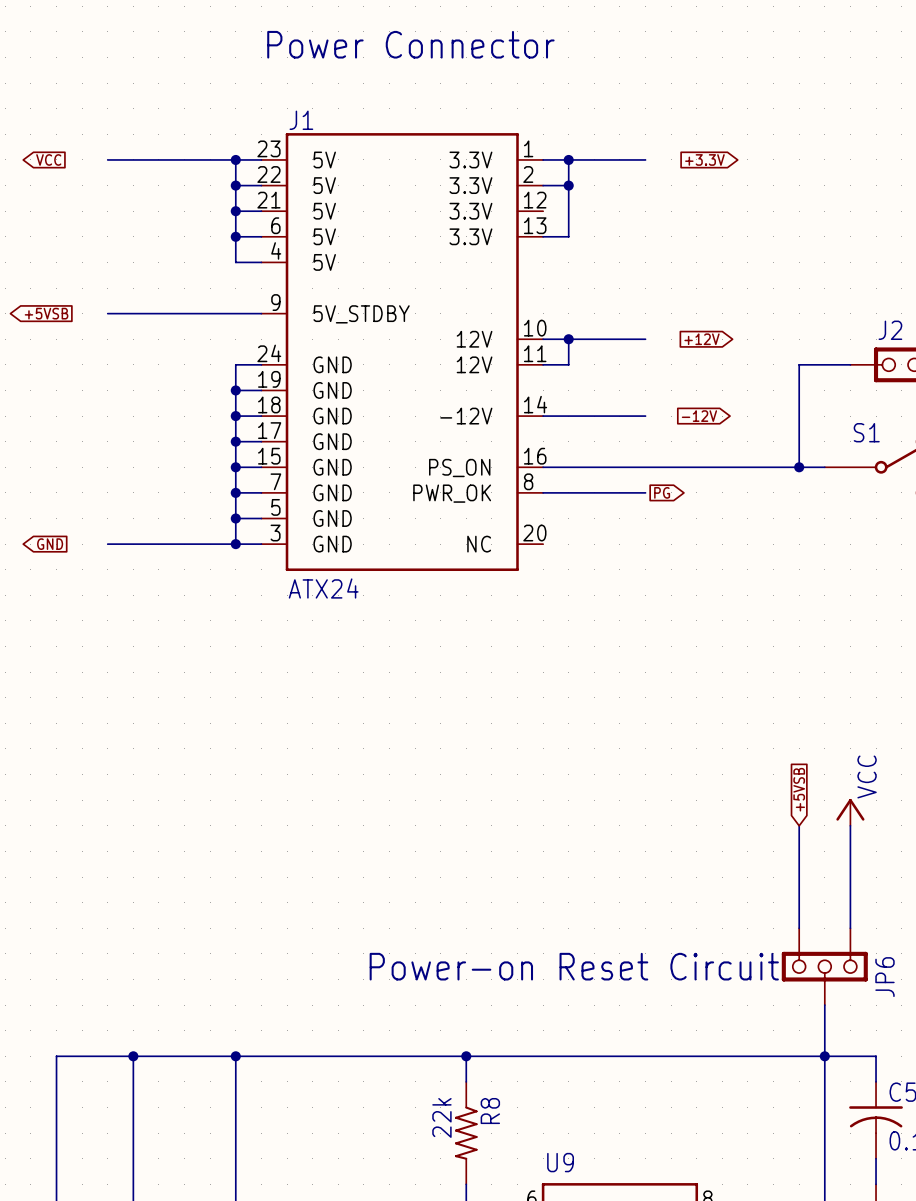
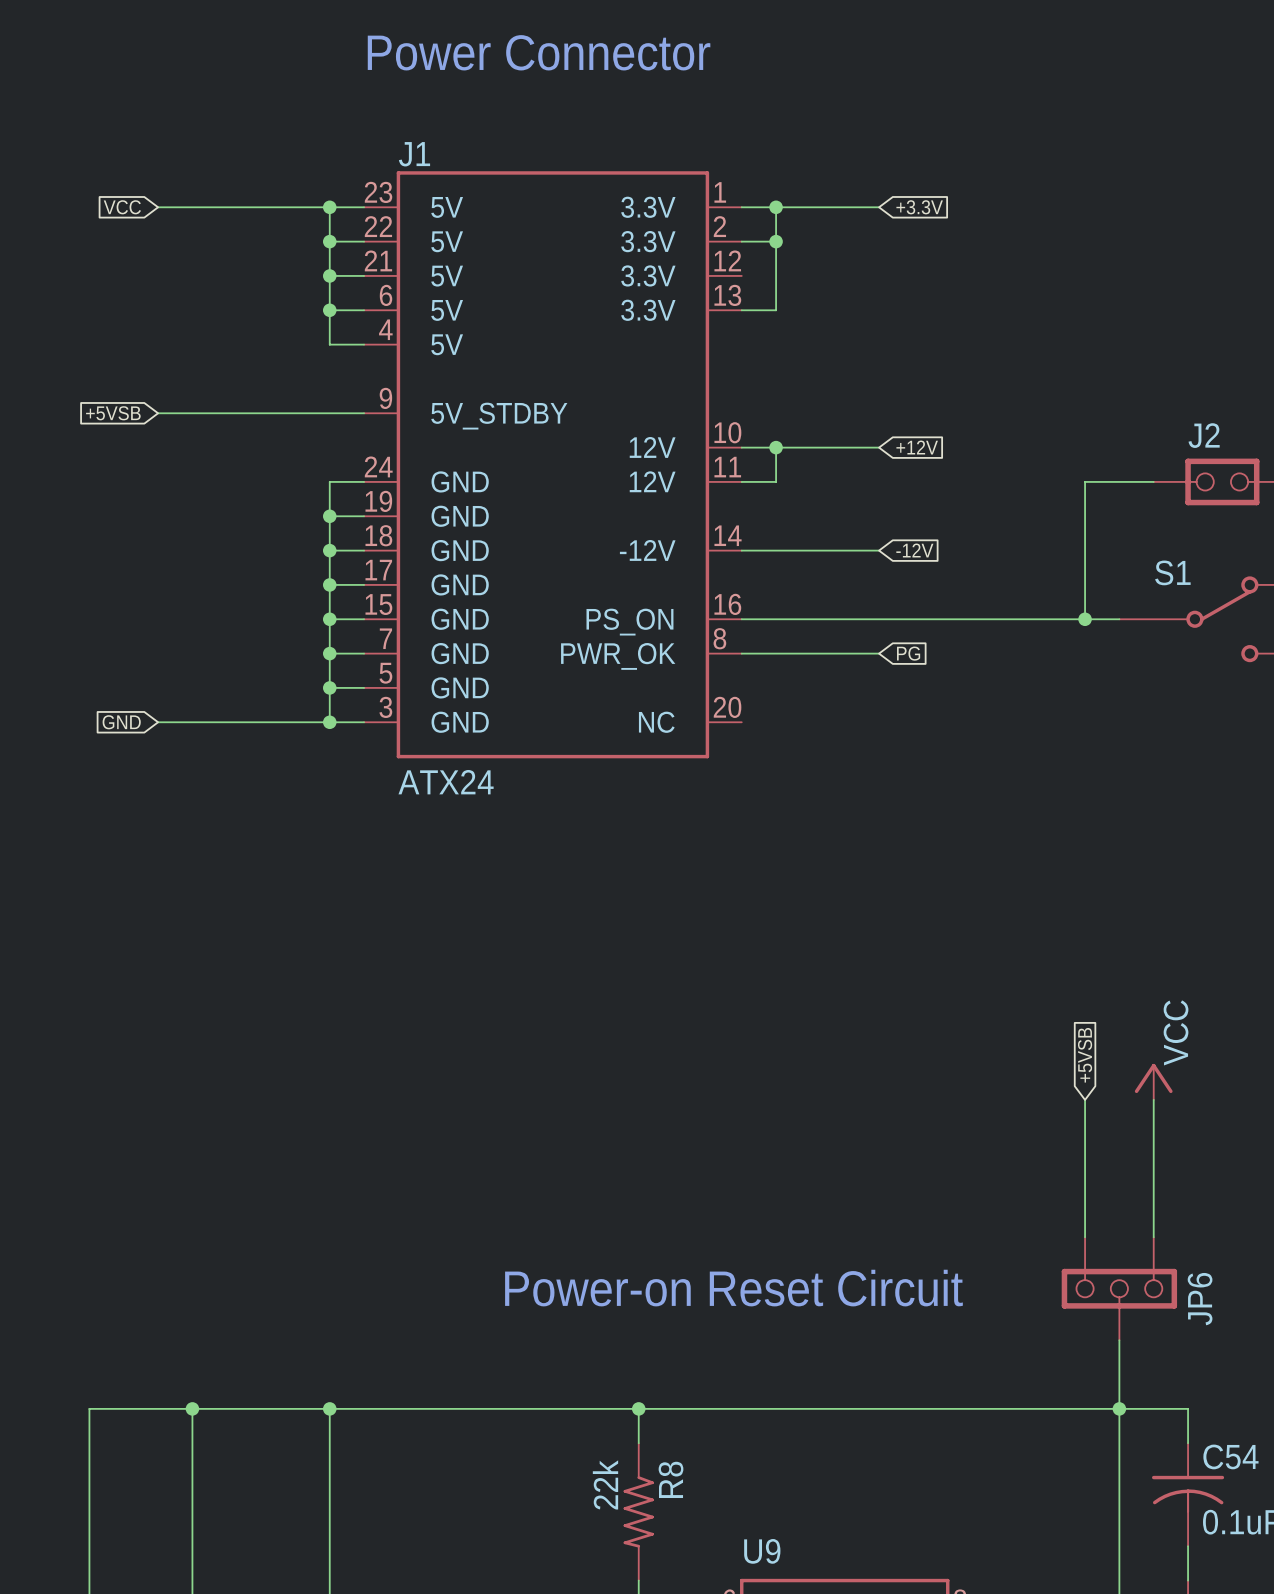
global label rotation: 0° (48, 159) -> 180° (122, 207)
global label rotation: 0° (704, 159) -> 180° (919, 207)
global label rotation: 0° (46, 313) -> 180° (113, 413)
global label rotation: 0° (702, 339) -> 180° (917, 447)
global label rotation: 0° (699, 416) -> 180° (914, 550)
global label rotation: 0° (662, 492) -> 180° (908, 653)
global label rotation: 0° (50, 544) -> 180° (121, 722)

